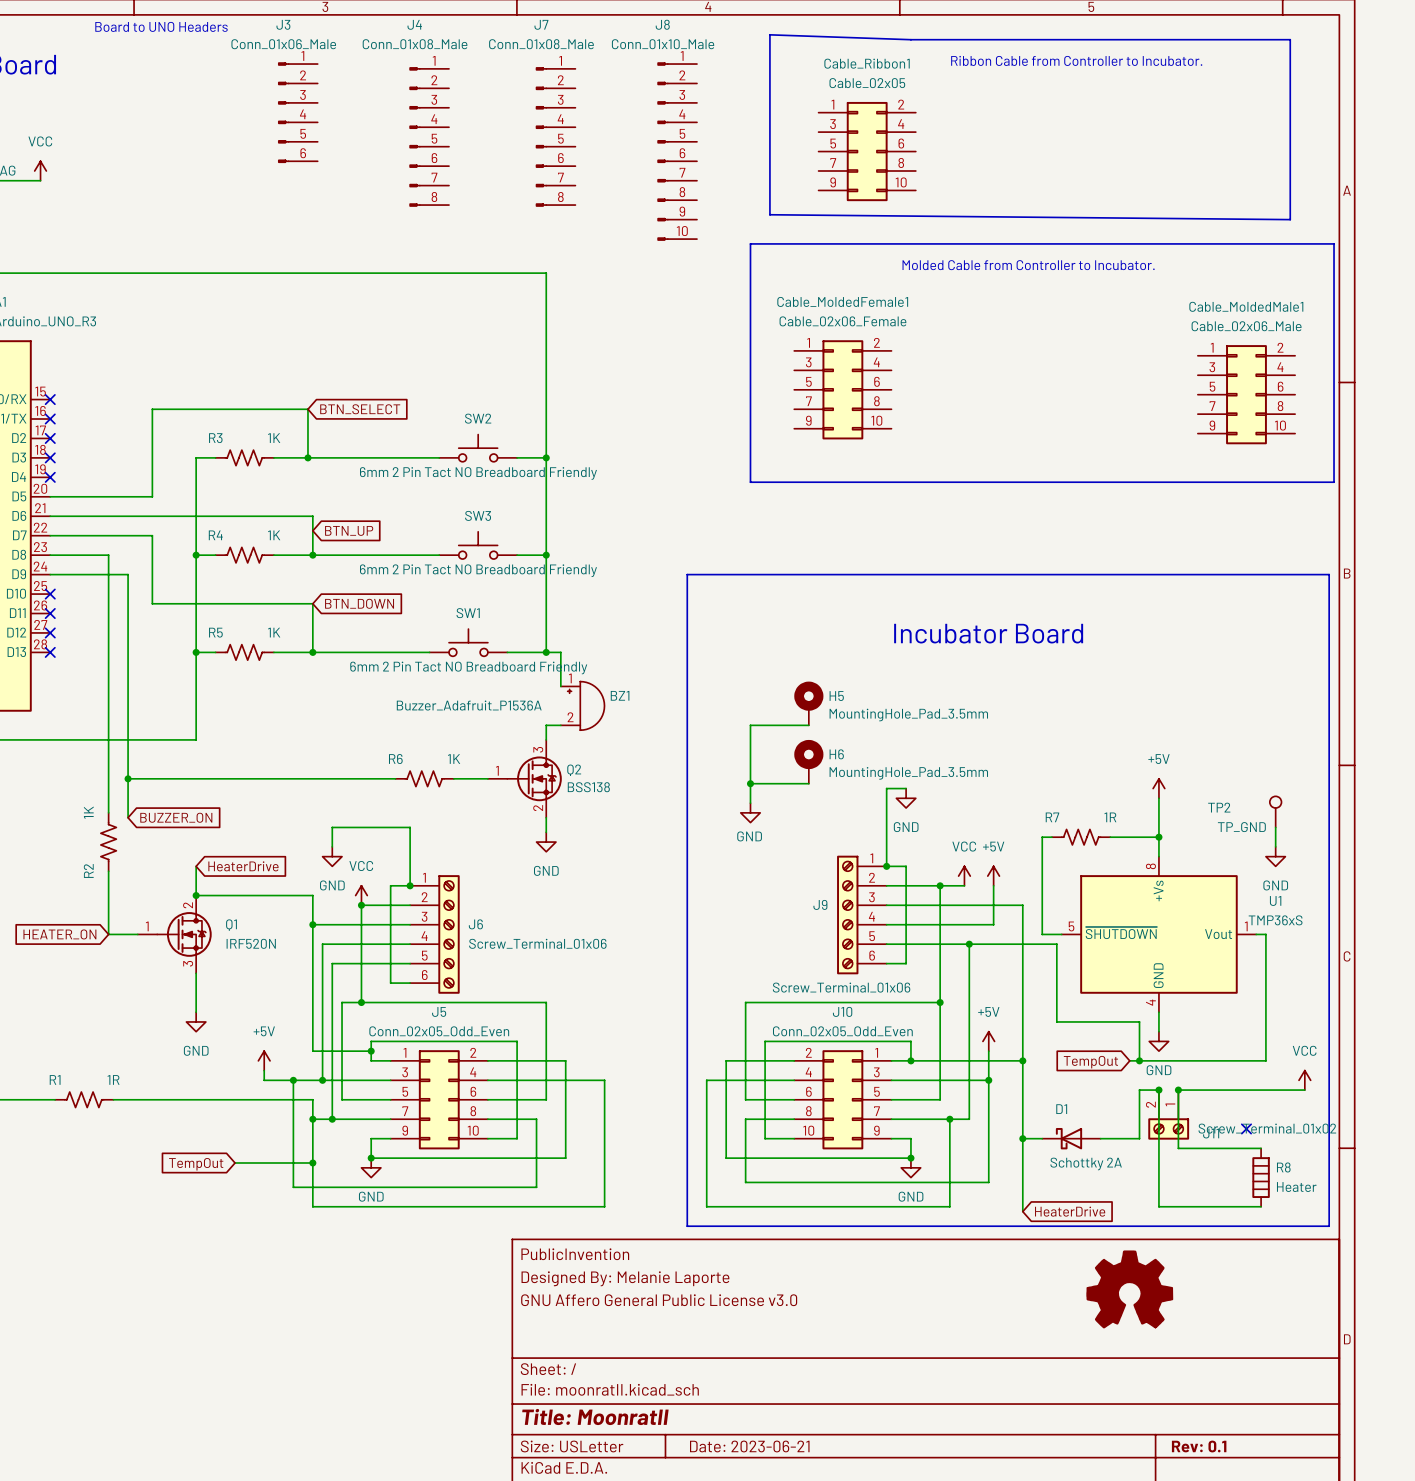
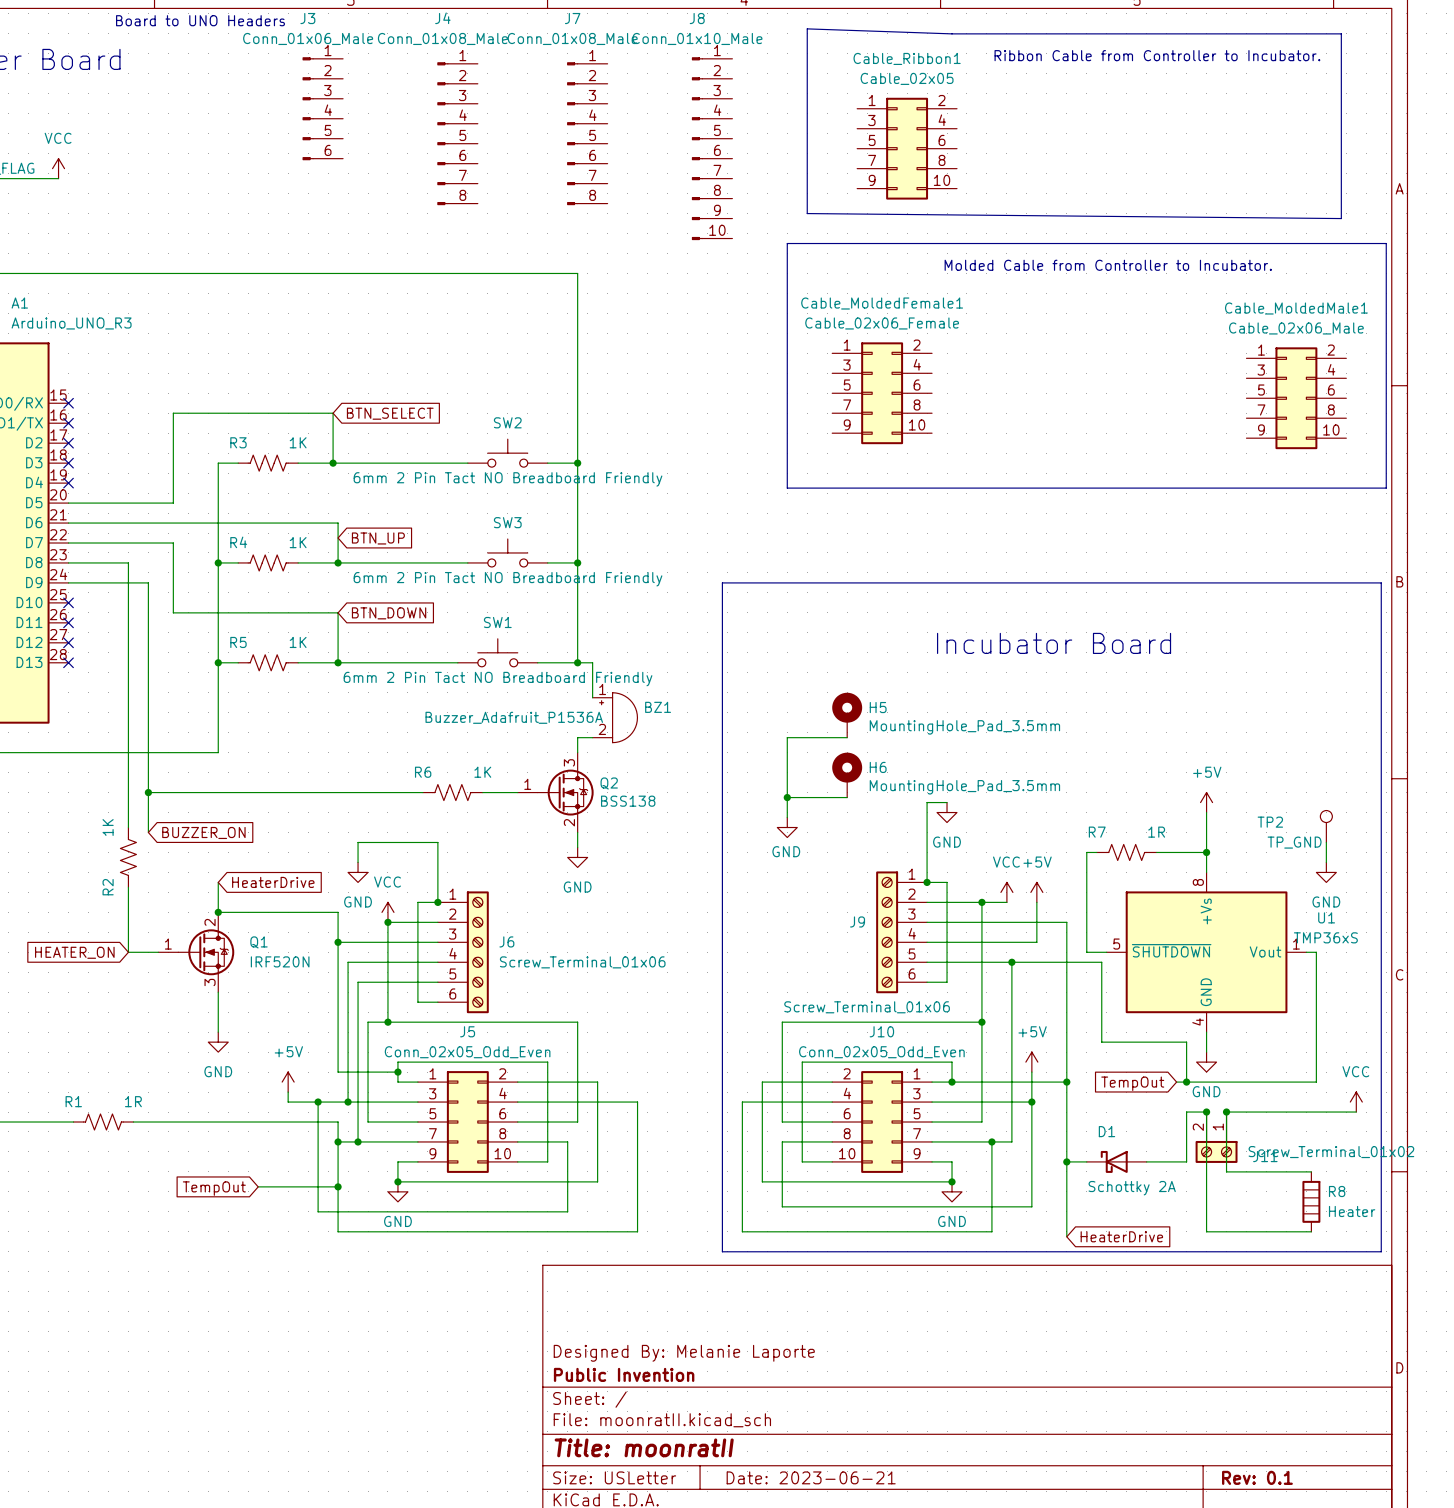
no-connect mark: (1246, 1128) -> none
title block: PublicInvention (575, 1254) -> none
title block position: Designed By: Melanie Laporte (625, 1278) -> Designed By: Melanie Laporte (684, 1353)
power symbol: (1129, 1289) -> none
title block: GNU Affero General Public License v3.0 (659, 1300) -> none
title block: none -> Public Invention (624, 1374)
title block: Title: MoonratII (595, 1416) -> Title: moonratII (644, 1447)

